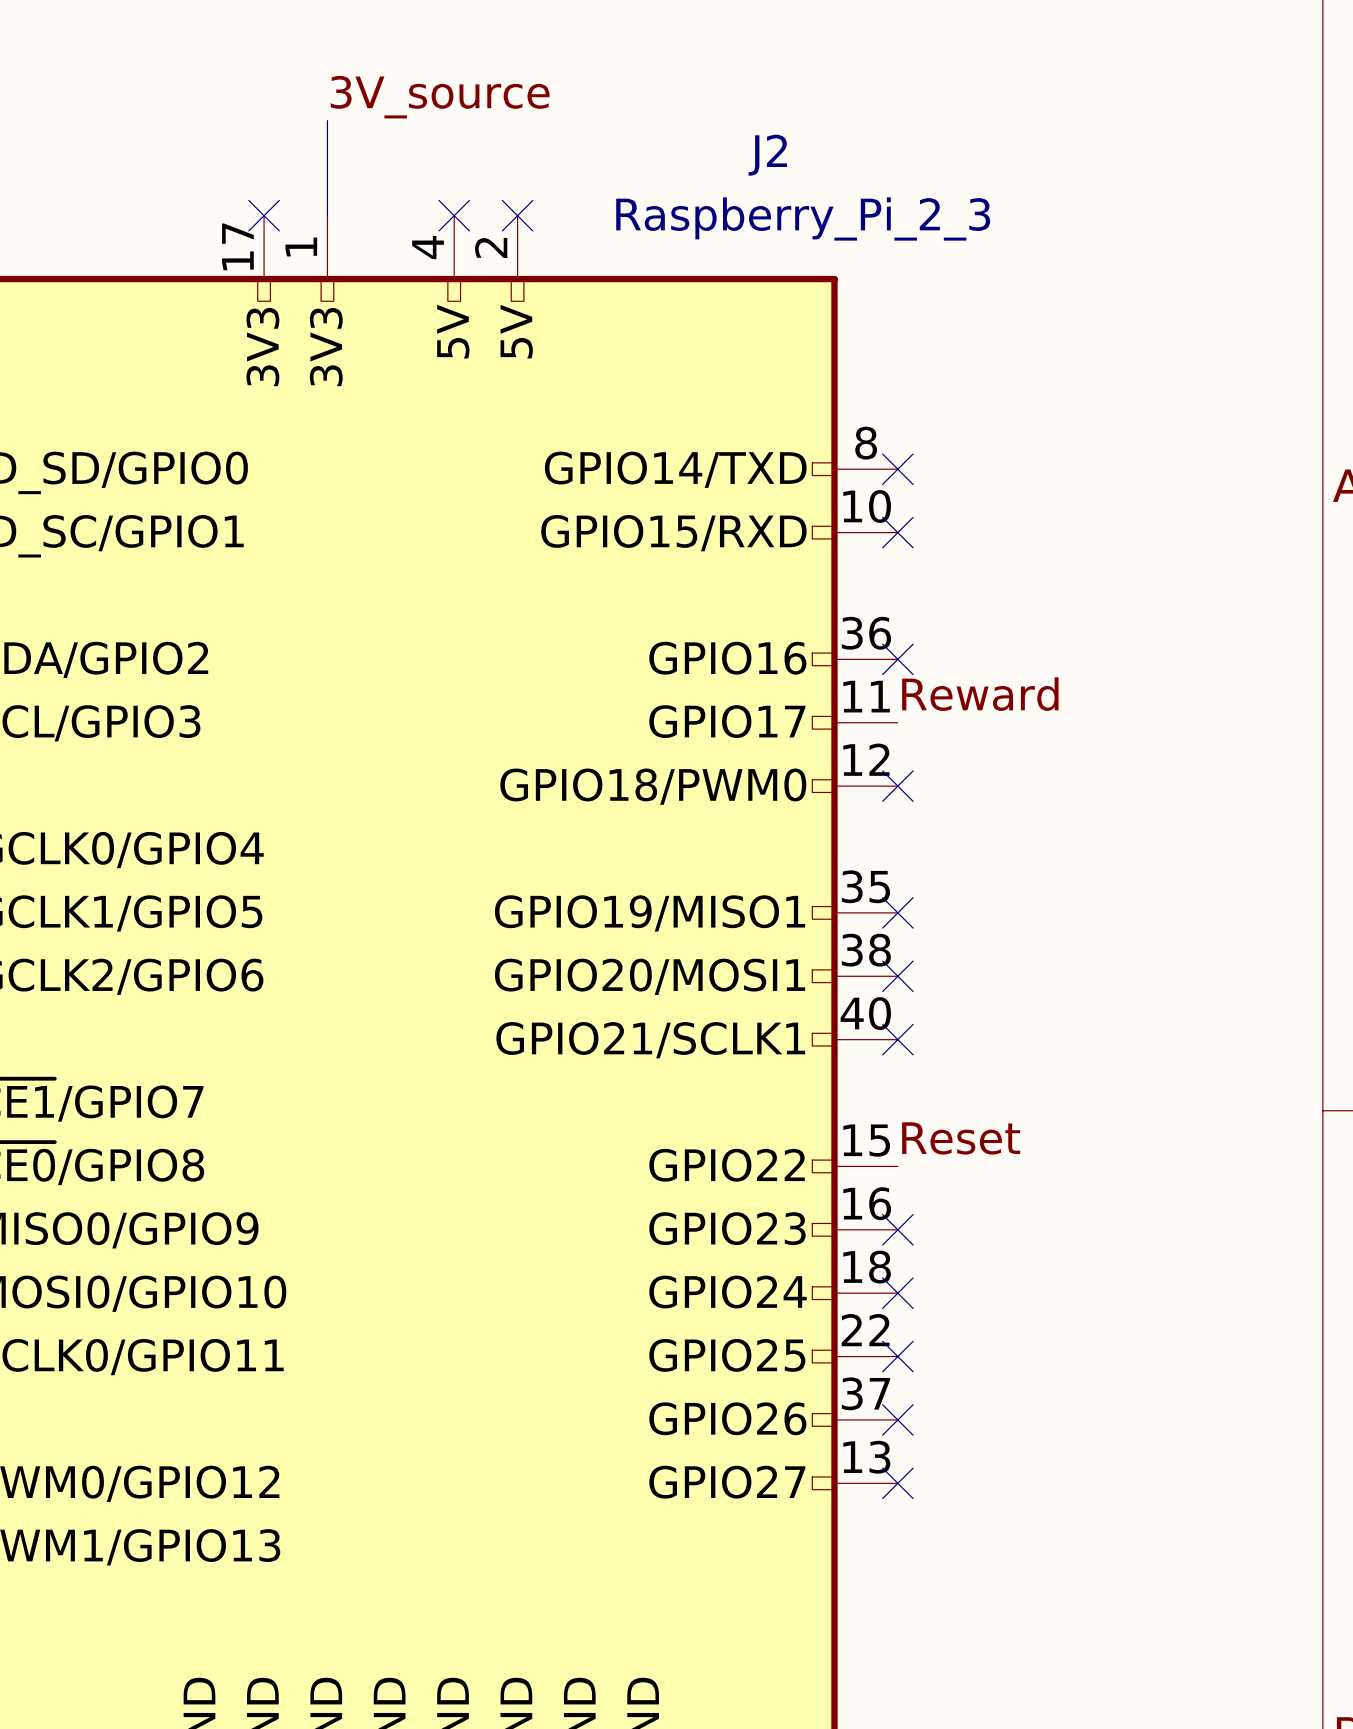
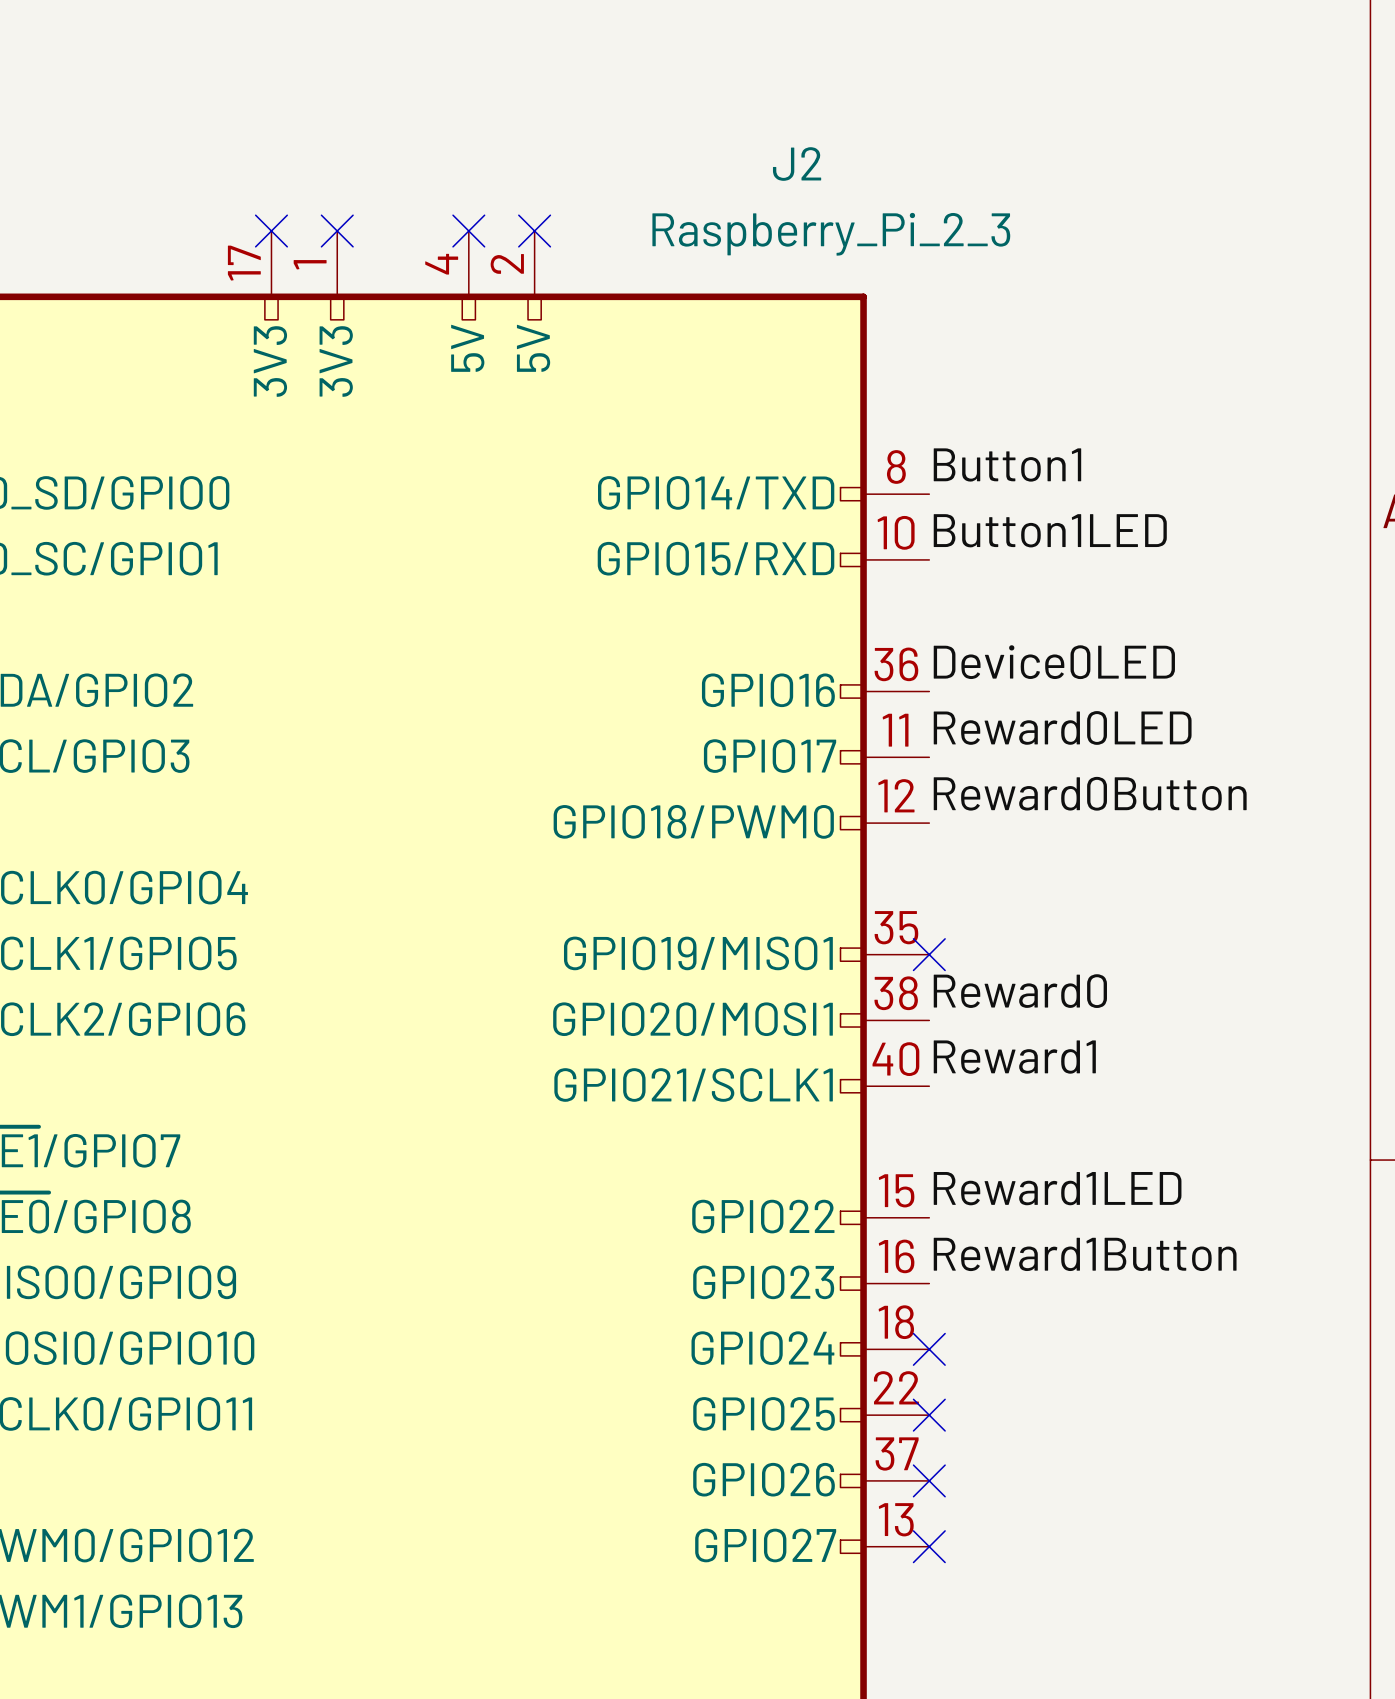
label: 3V_source (440, 97) -> none
wire: (327, 120) (327, 215) -> none
no-connect mark: none -> (337, 231)
label: none -> Button1 (1007, 465)
no-connect mark: (897, 469) -> none
label: none -> Button1LED (1050, 530)
no-connect mark: (897, 532) -> none
label: none -> Device0LED (1054, 662)
no-connect mark: (897, 659) -> none
label: Reward (980, 694) -> Reward0LED (1062, 727)
label: none -> Reward0Button (1090, 793)
no-connect mark: (897, 786) -> none
label: none -> Reward0 (1020, 991)
no-connect mark: (897, 976) -> none
label: none -> Reward1 (1014, 1057)
no-connect mark: (897, 1039) -> none
label: Reset (961, 1138) -> Reward1LED (1057, 1188)
label: none -> Reward1Button (1085, 1254)
no-connect mark: (897, 1229) -> none

